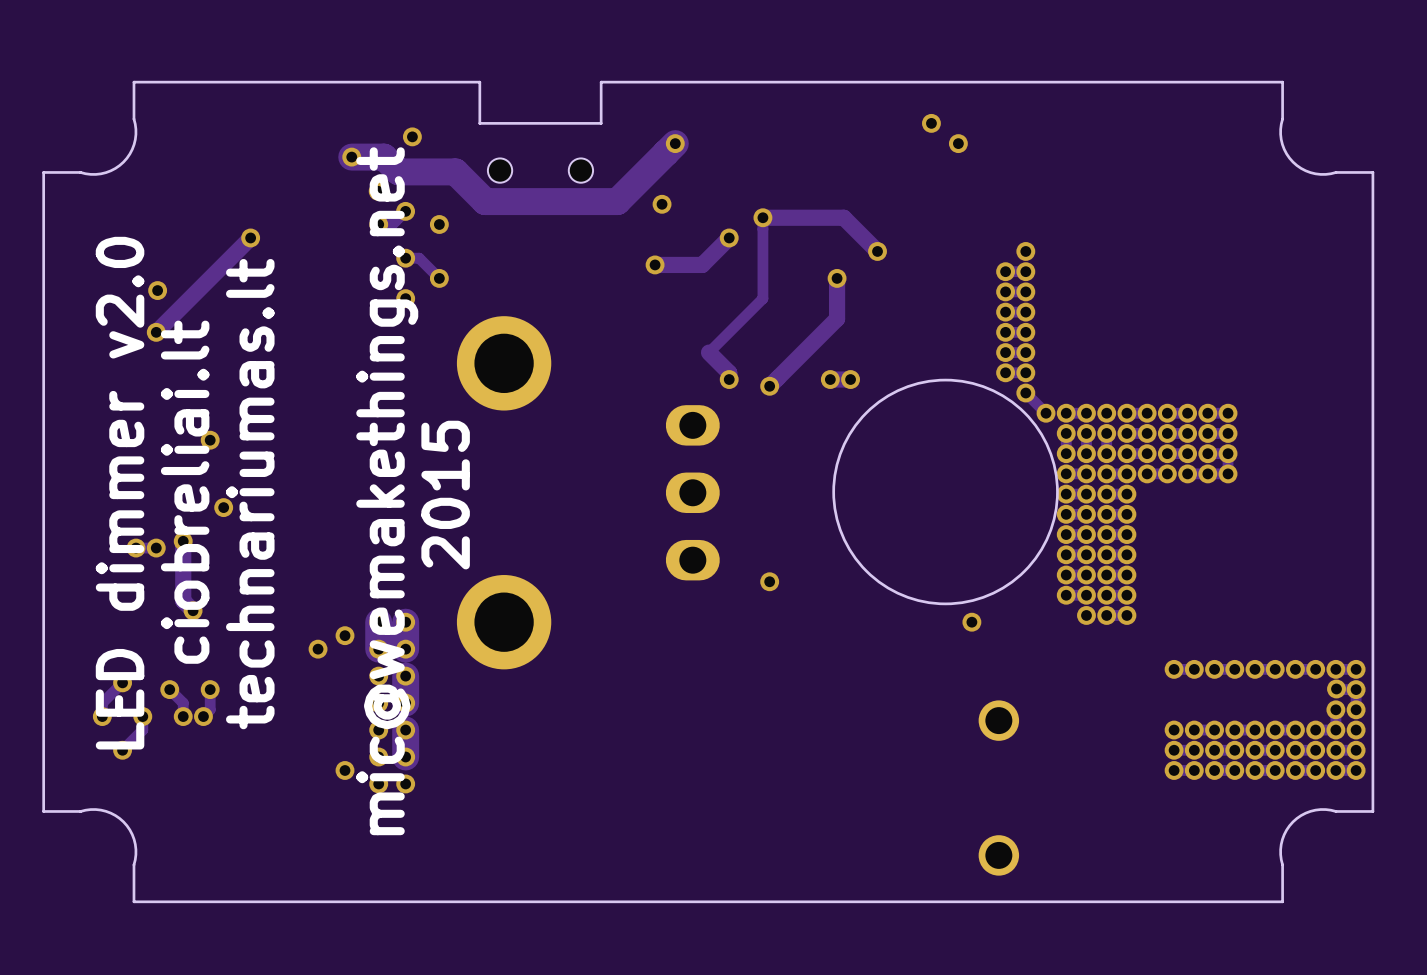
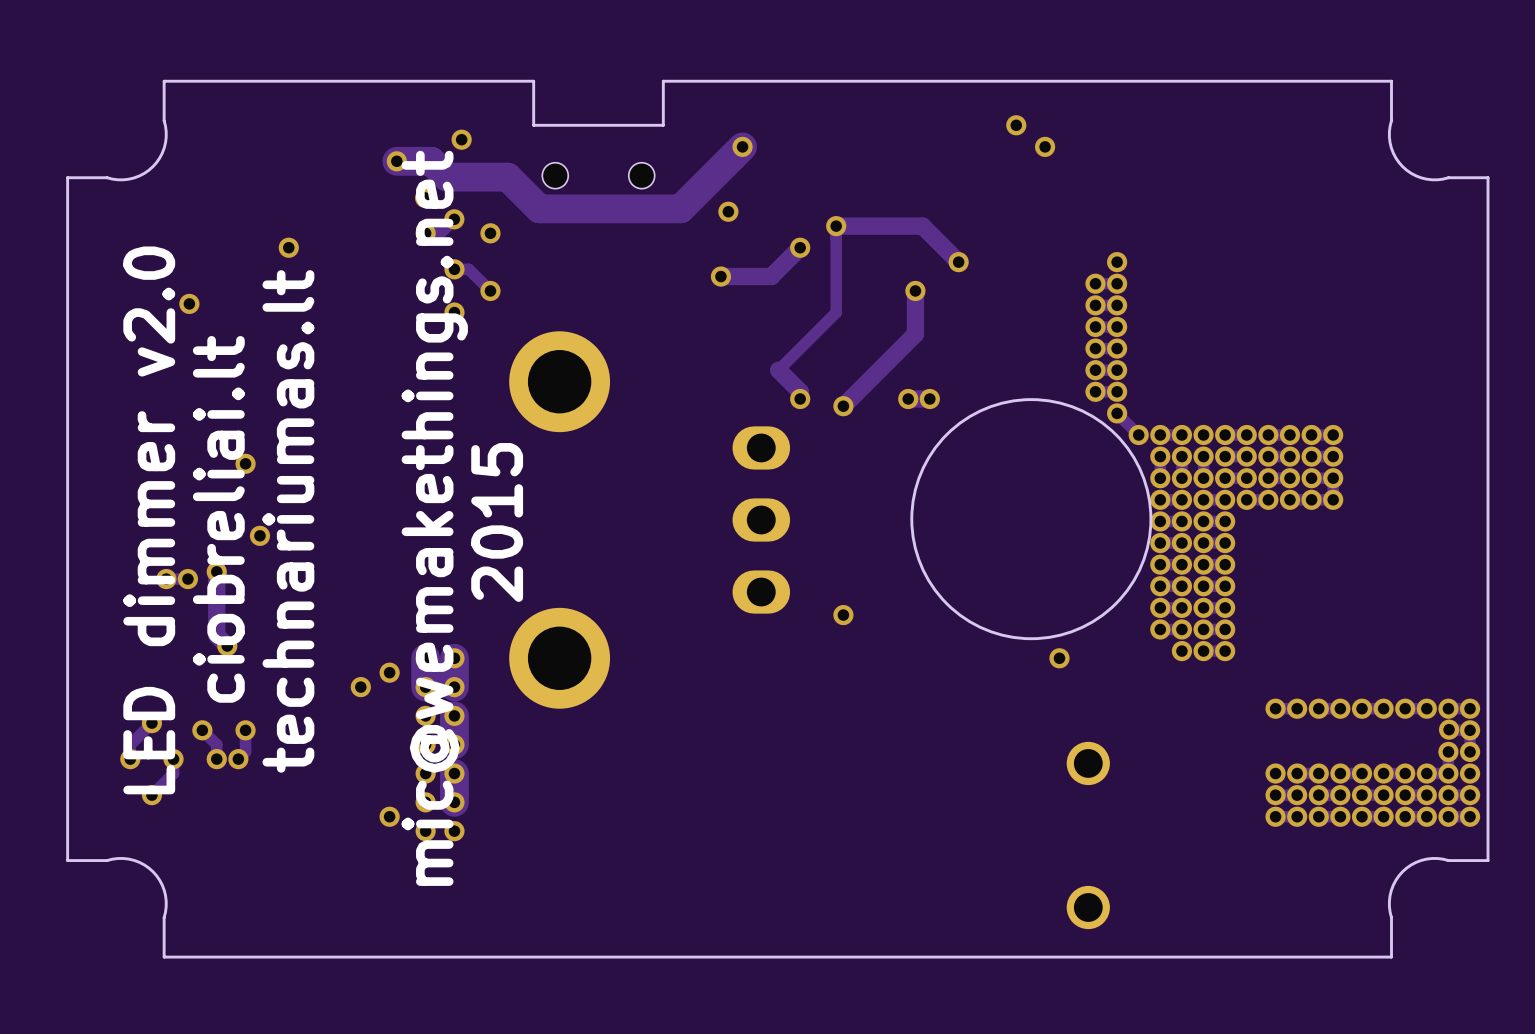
track: (250, 237) (156, 332) -> none
via: (156, 332) -> none

